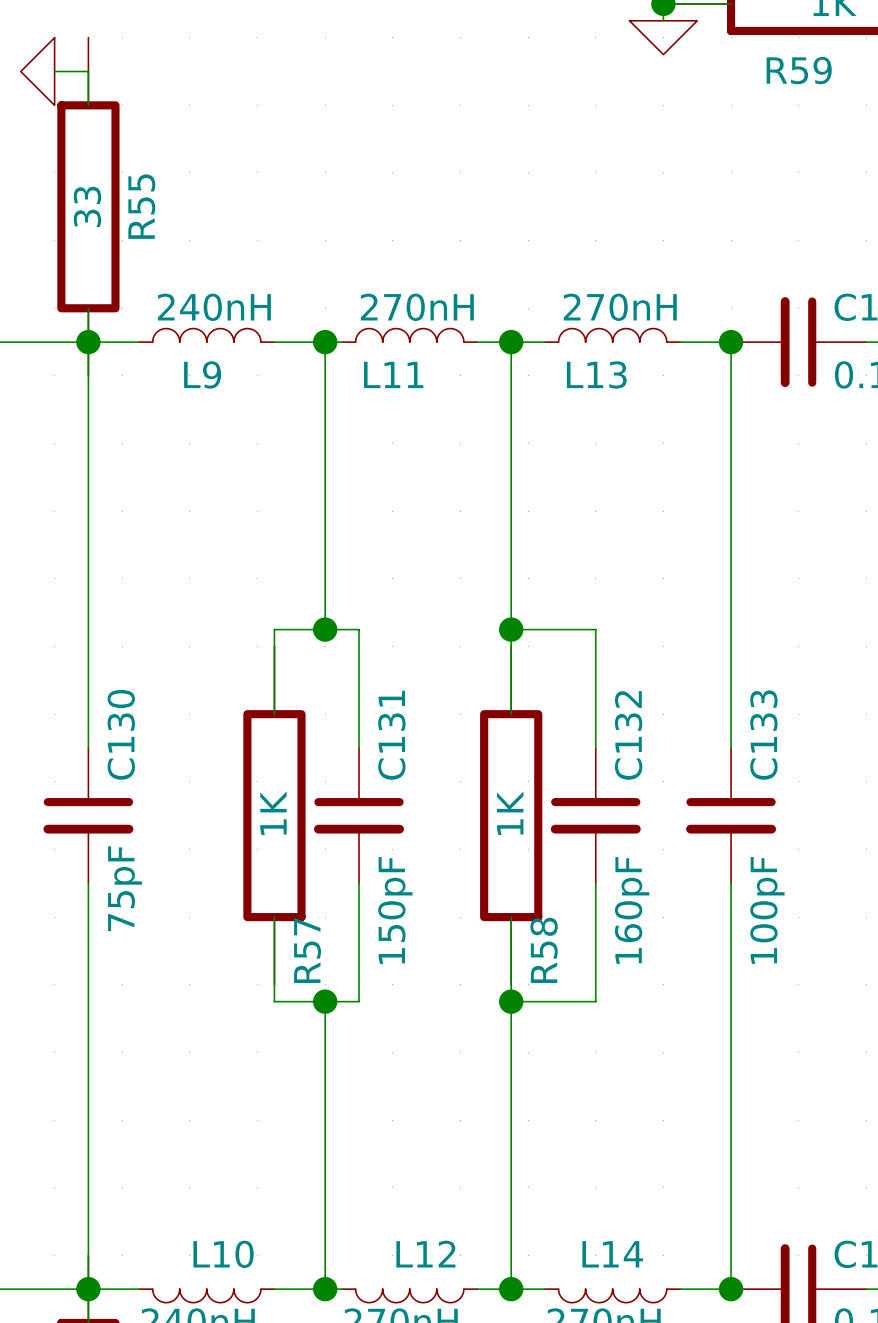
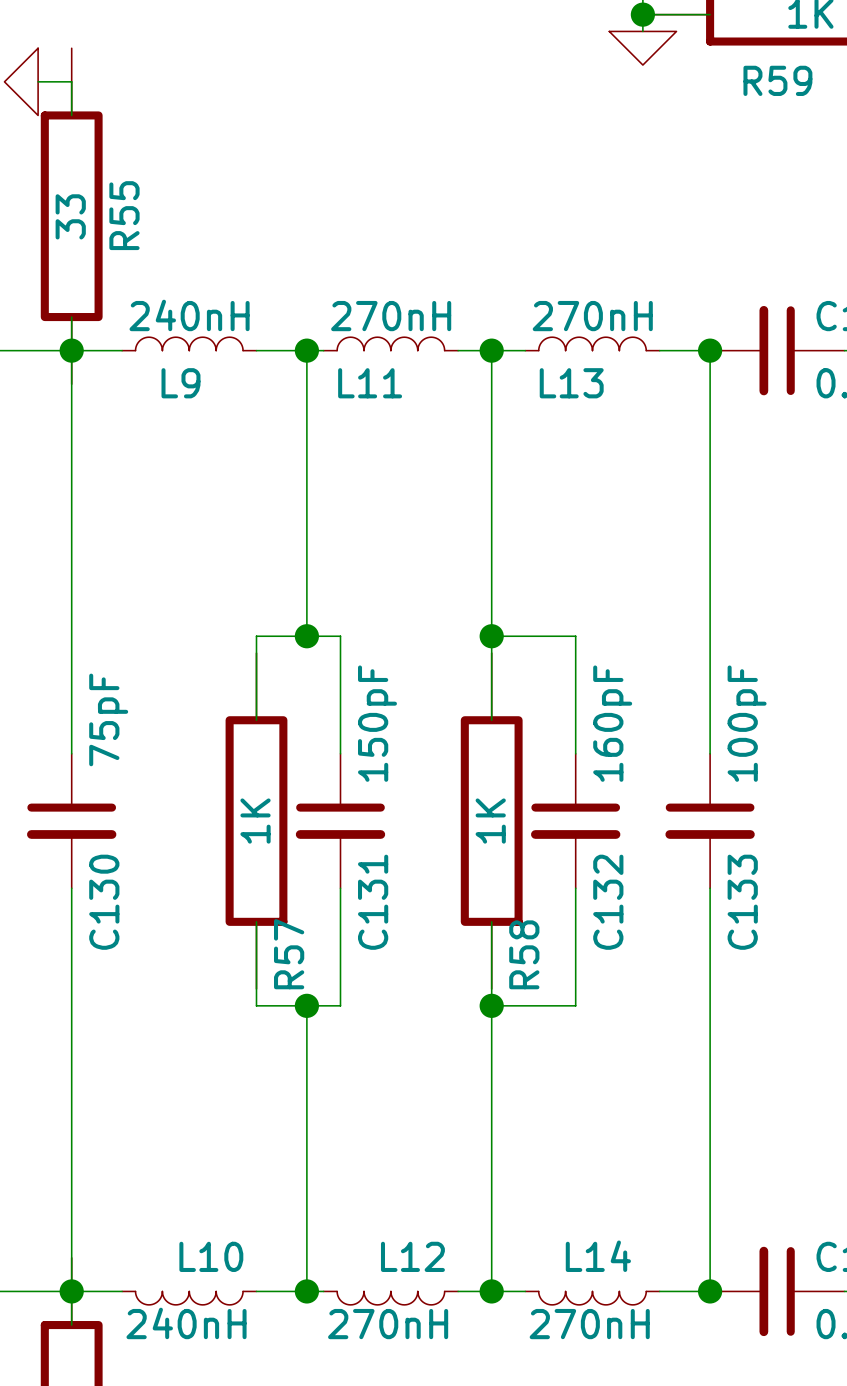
C130 name position: C130 (121, 734) -> C130 (104, 902)
C131 name position: C131 (391, 735) -> C131 (373, 902)
C132 name position: C132 (628, 735) -> C132 (608, 902)
C133 name position: C133 (763, 735) -> C133 (742, 902)
C130 value position: 75pF (125, 888) -> 75pF (108, 719)
C131 value position: 150pF (395, 910) -> 150pF (377, 723)
C132 value position: 160pF (632, 910) -> 160pF (612, 723)
C133 value position: 100pF (767, 910) -> 100pF (747, 723)

